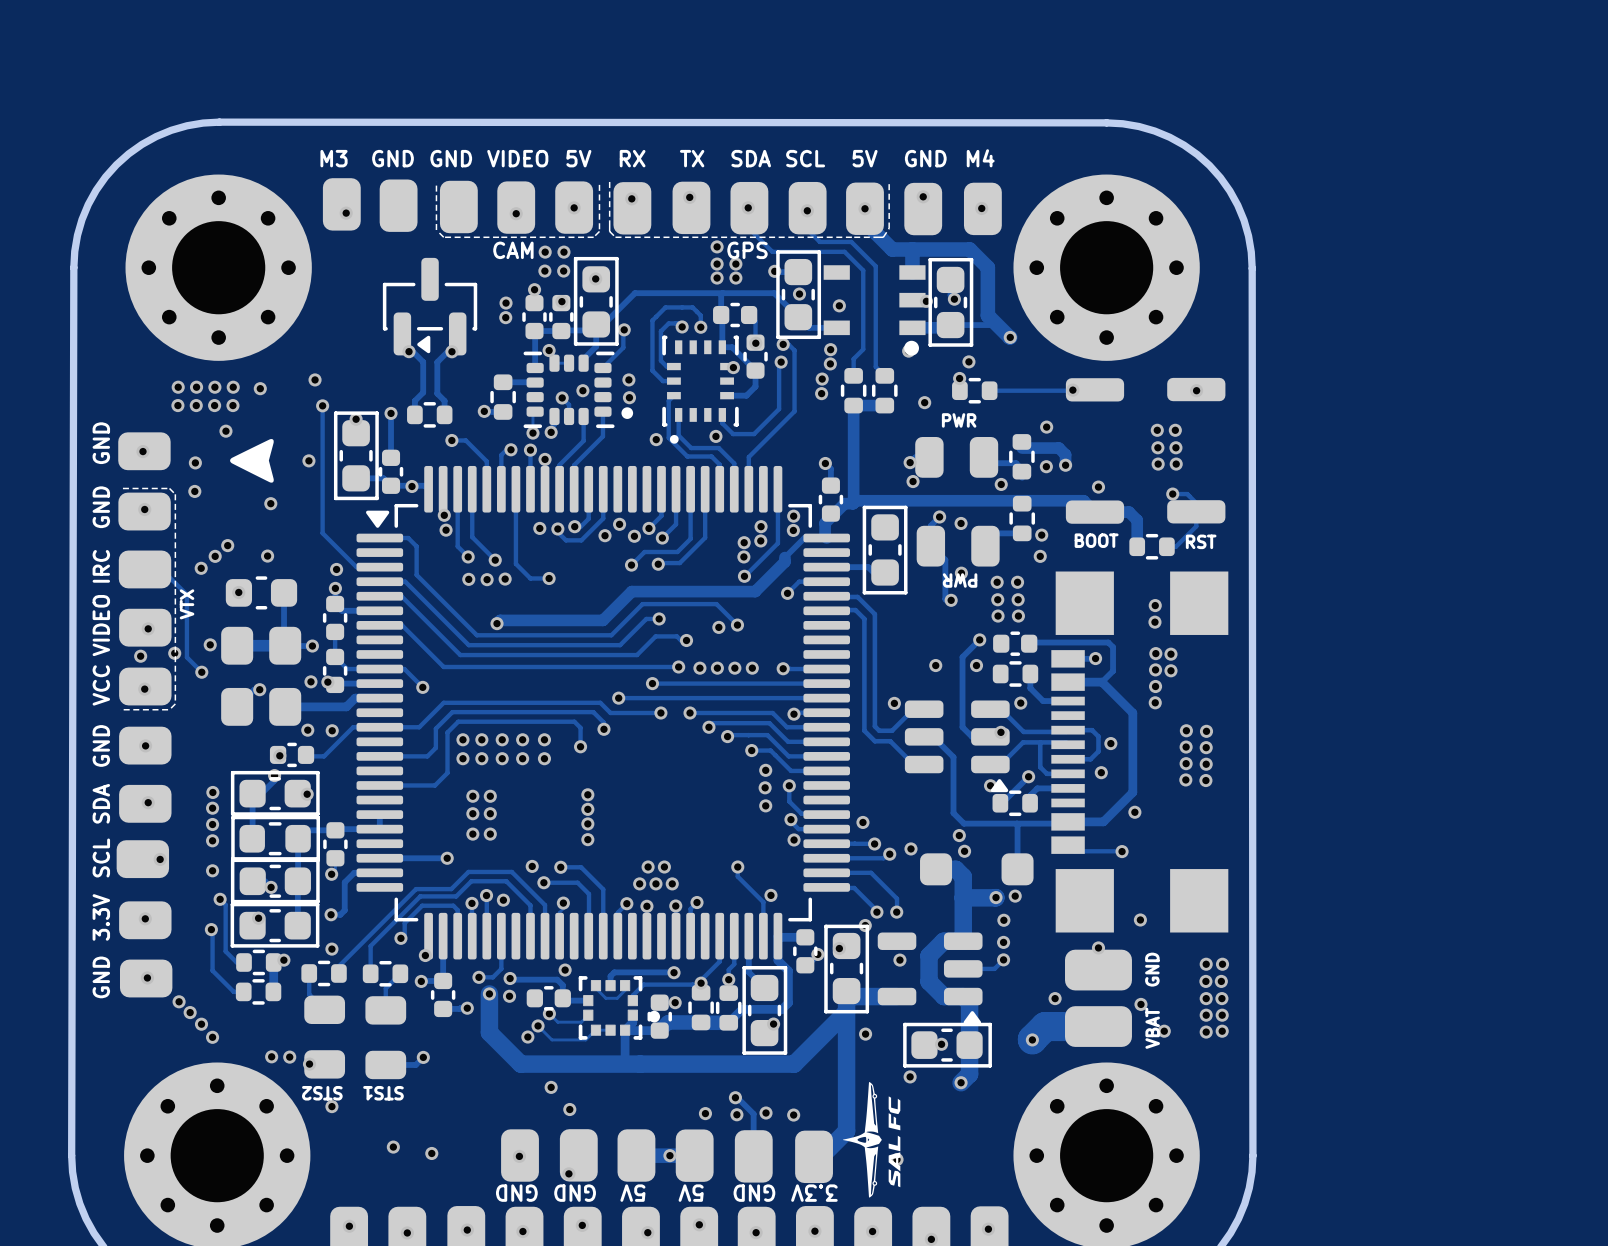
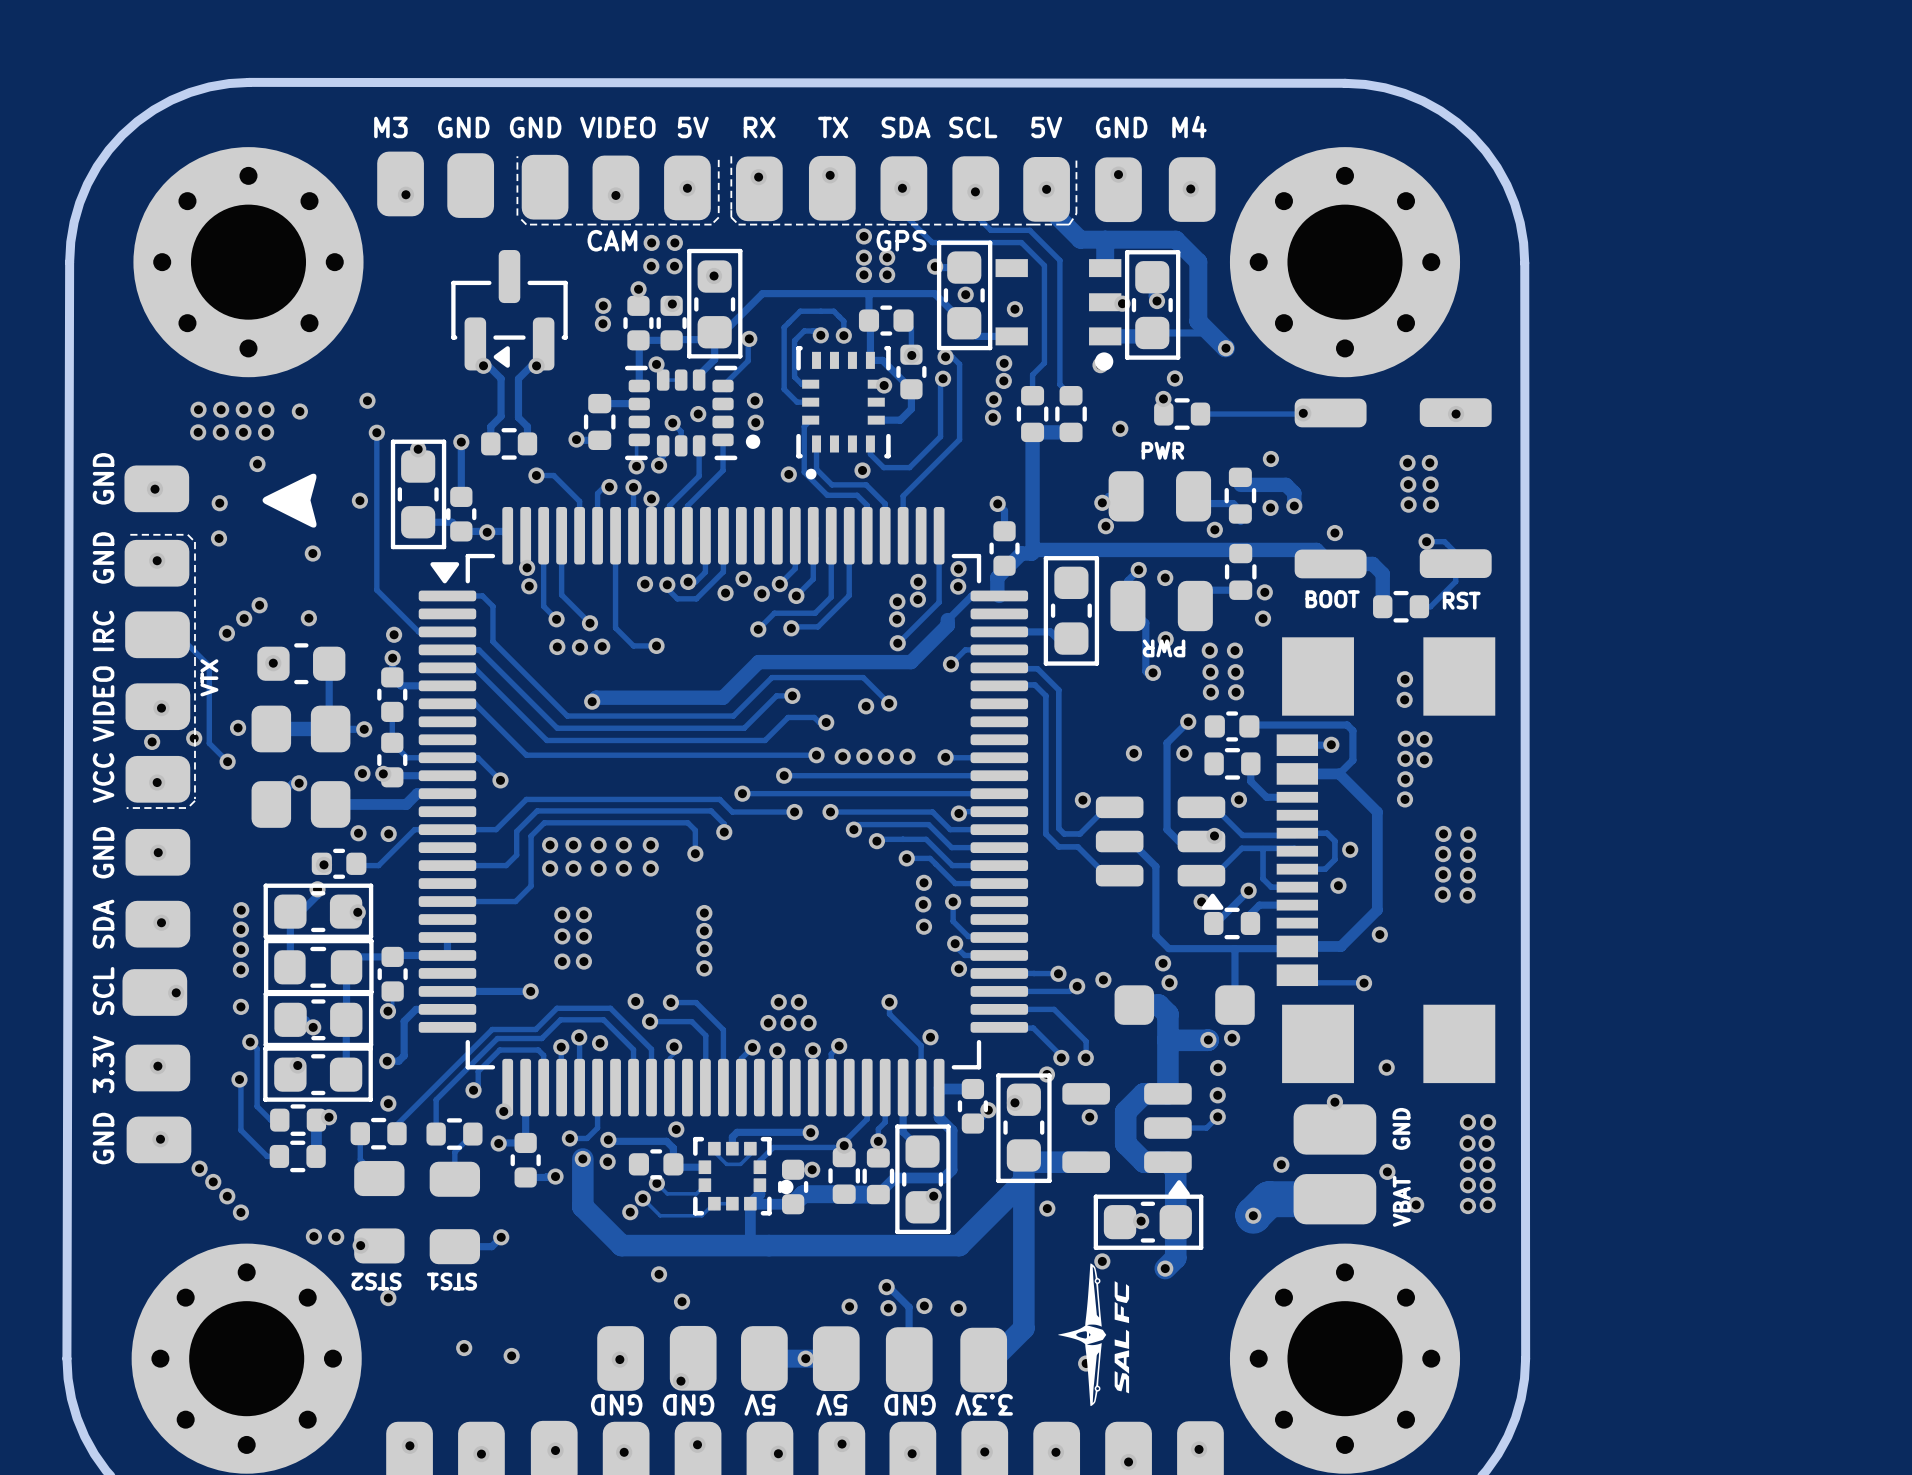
via: (862, 822) -> none
drawing position: (871, 1139) -> (1093, 1334)

